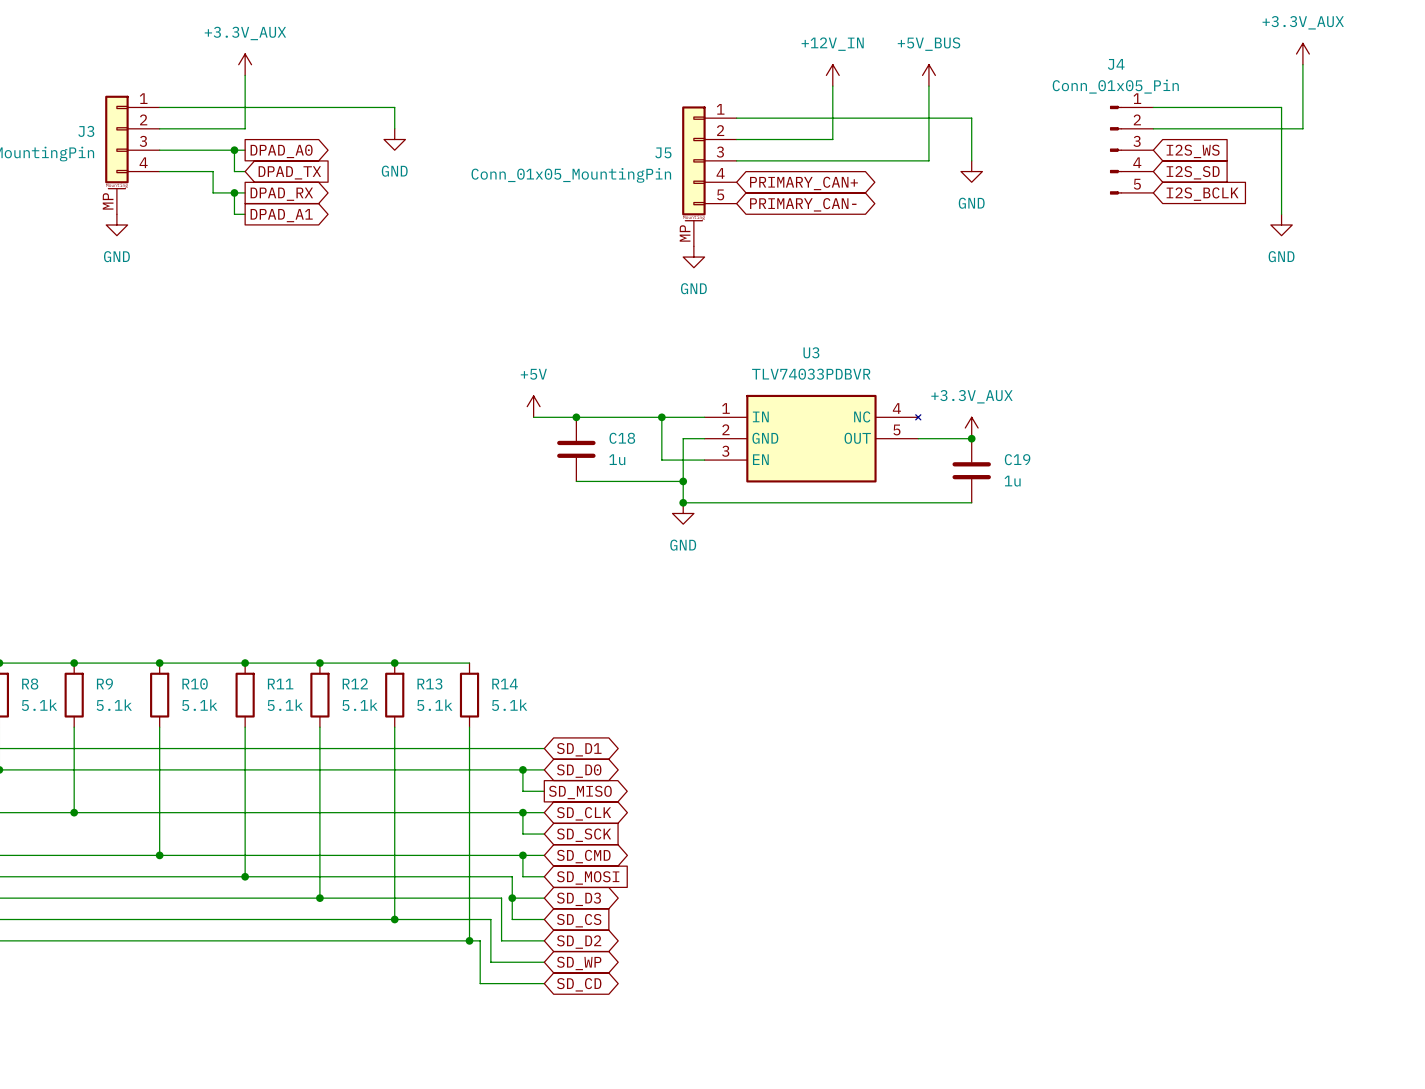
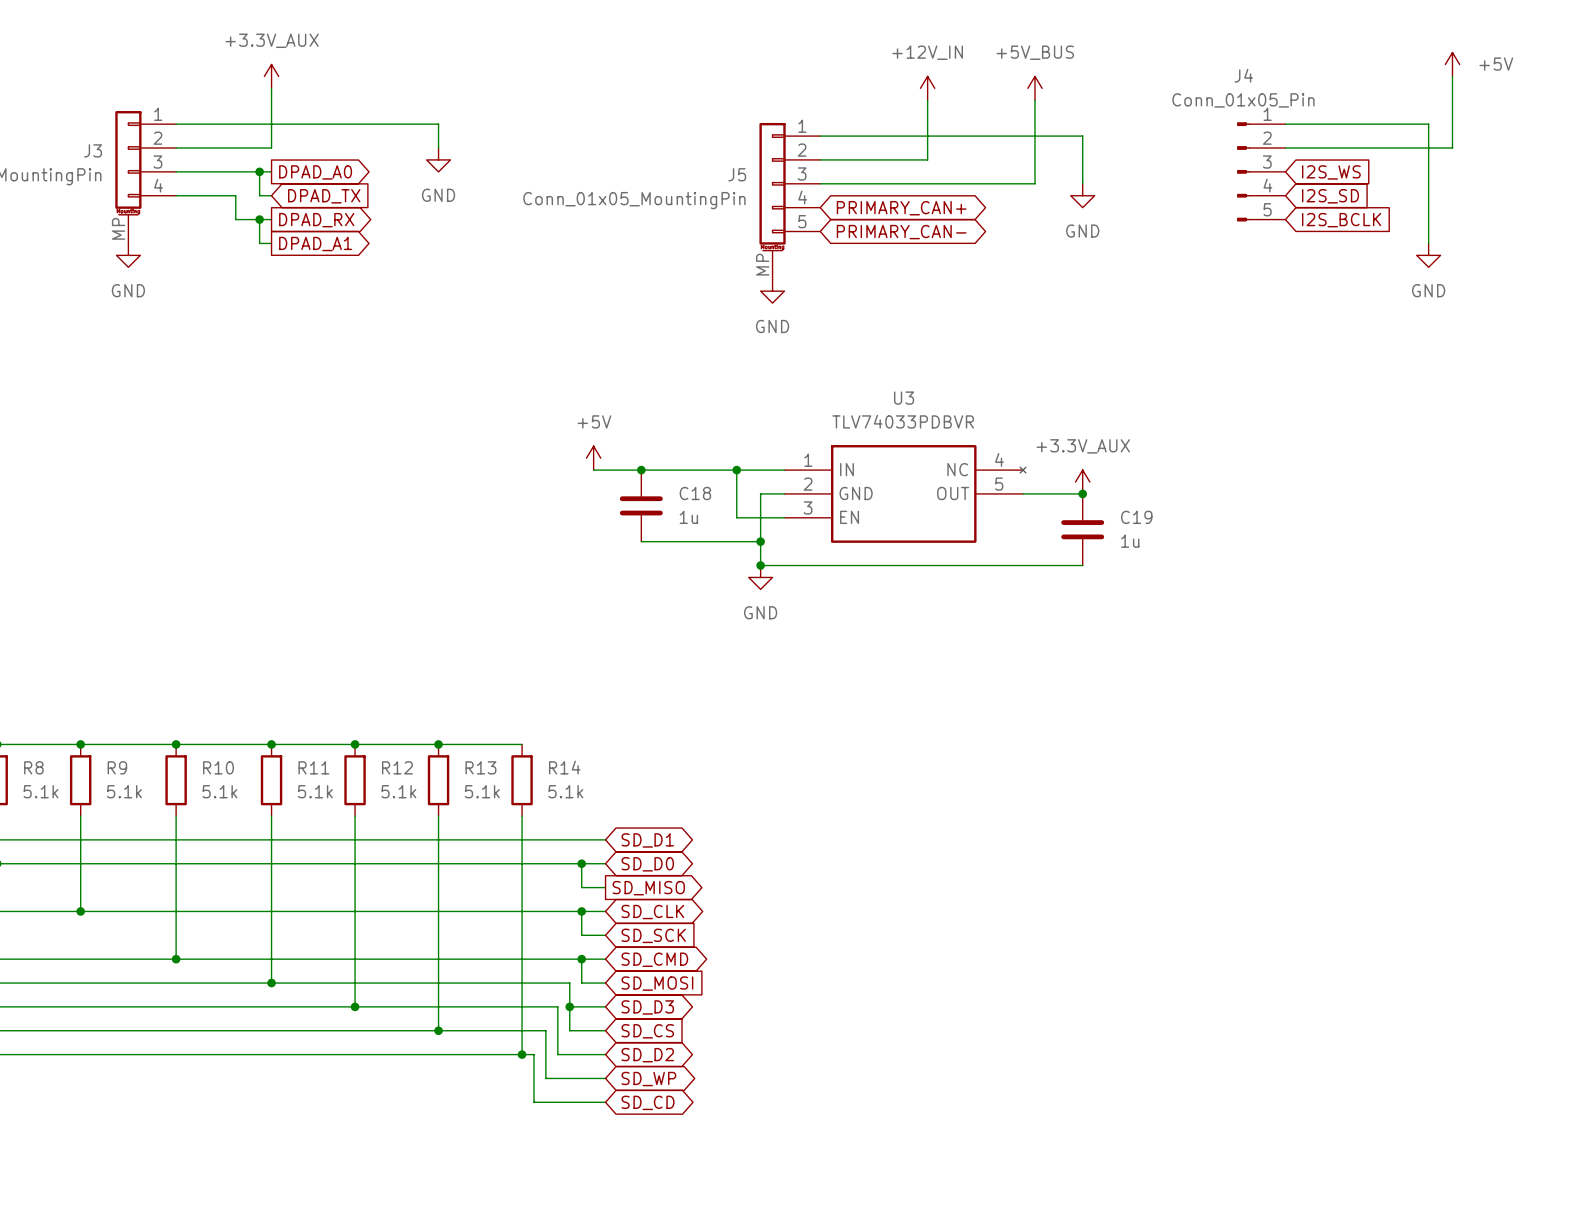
power symbol: +3.3V_AUX (1302, 54) -> +5V (1452, 64)

